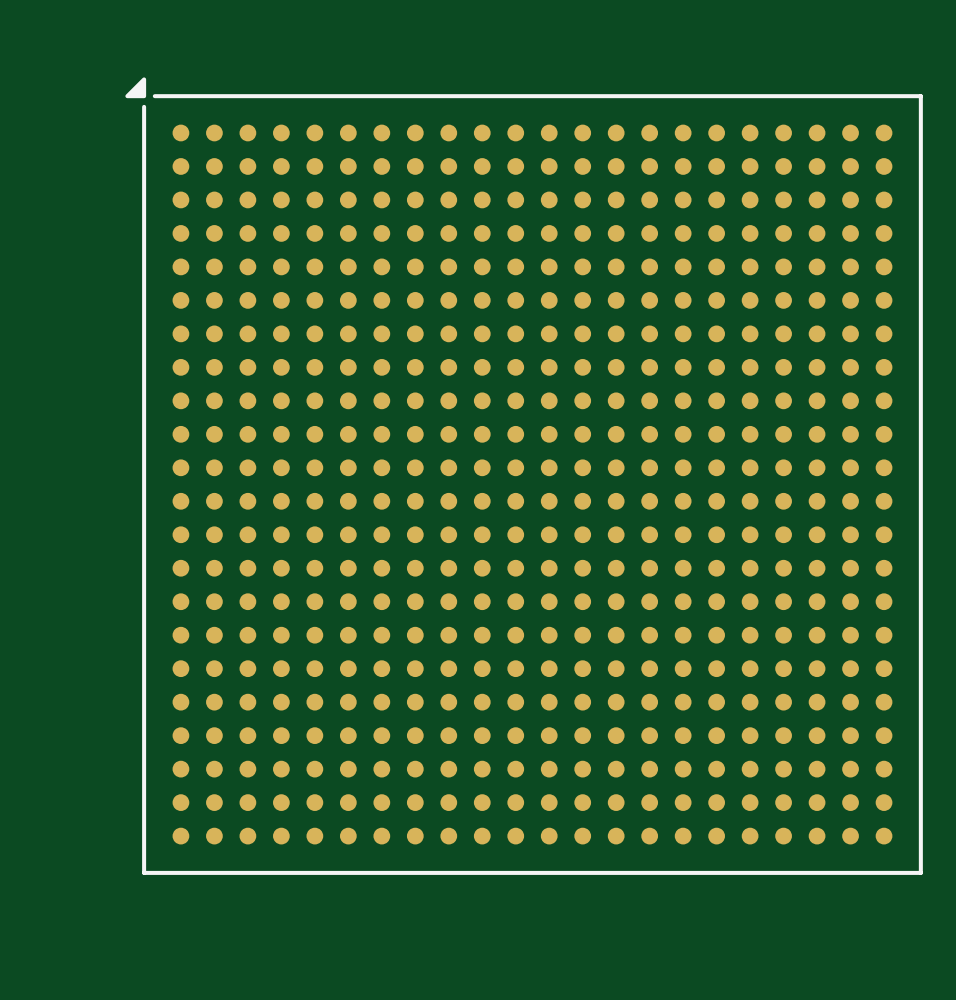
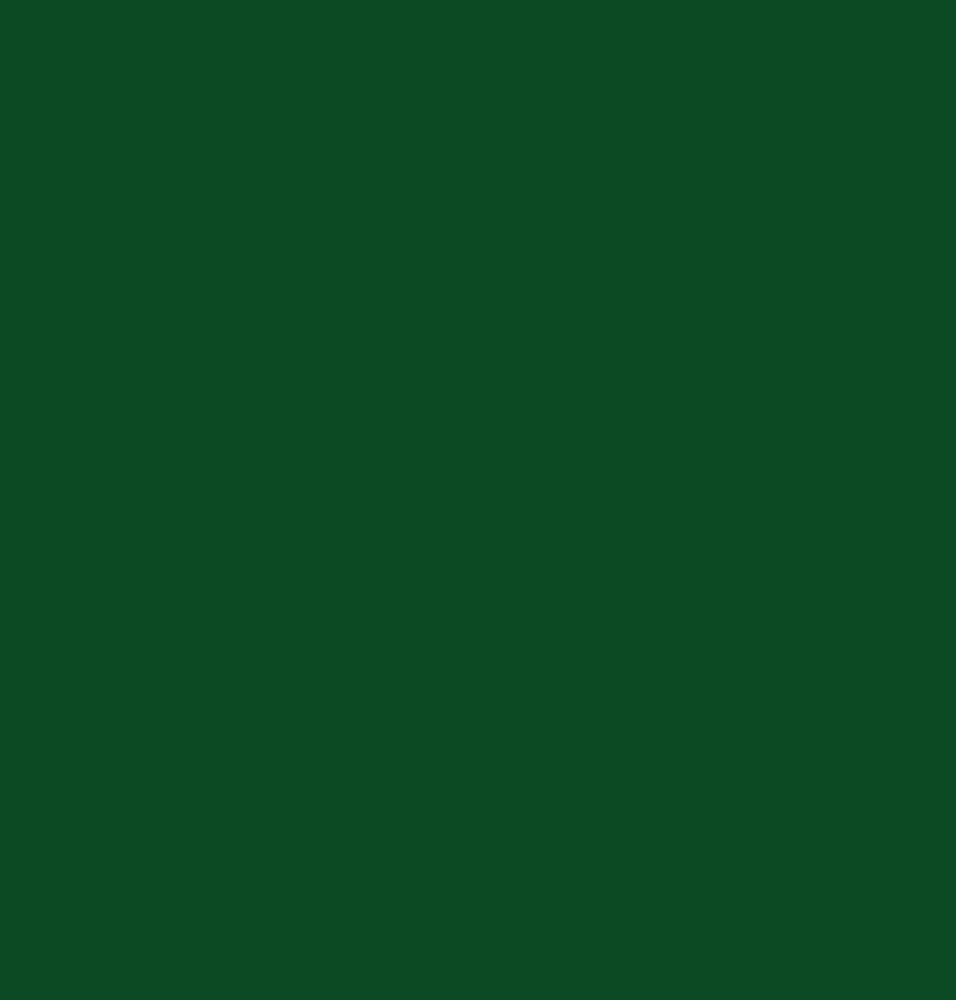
part: (524, 476) -> none

